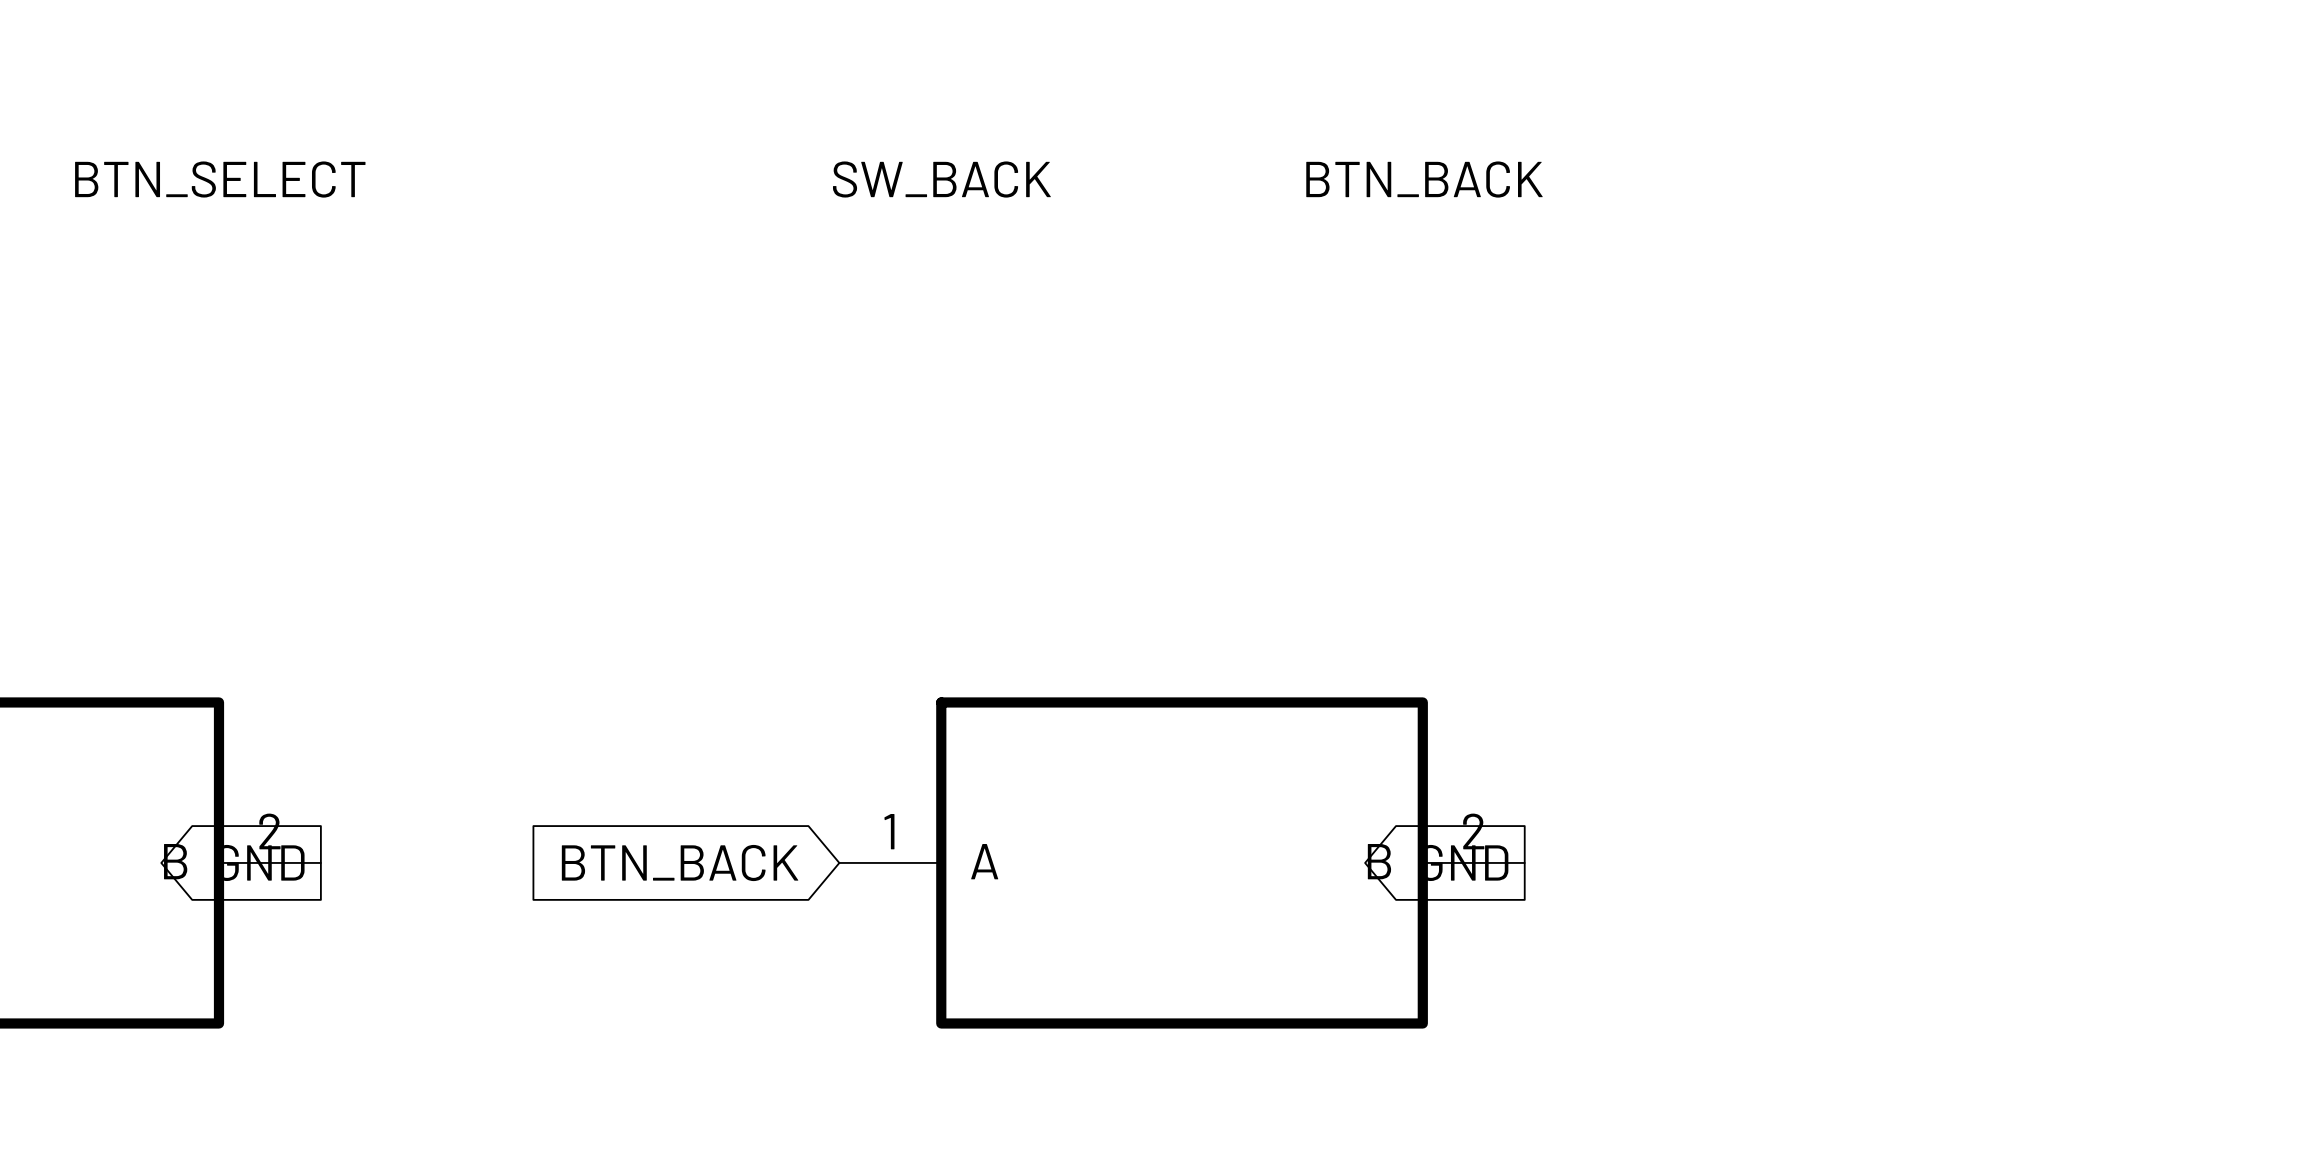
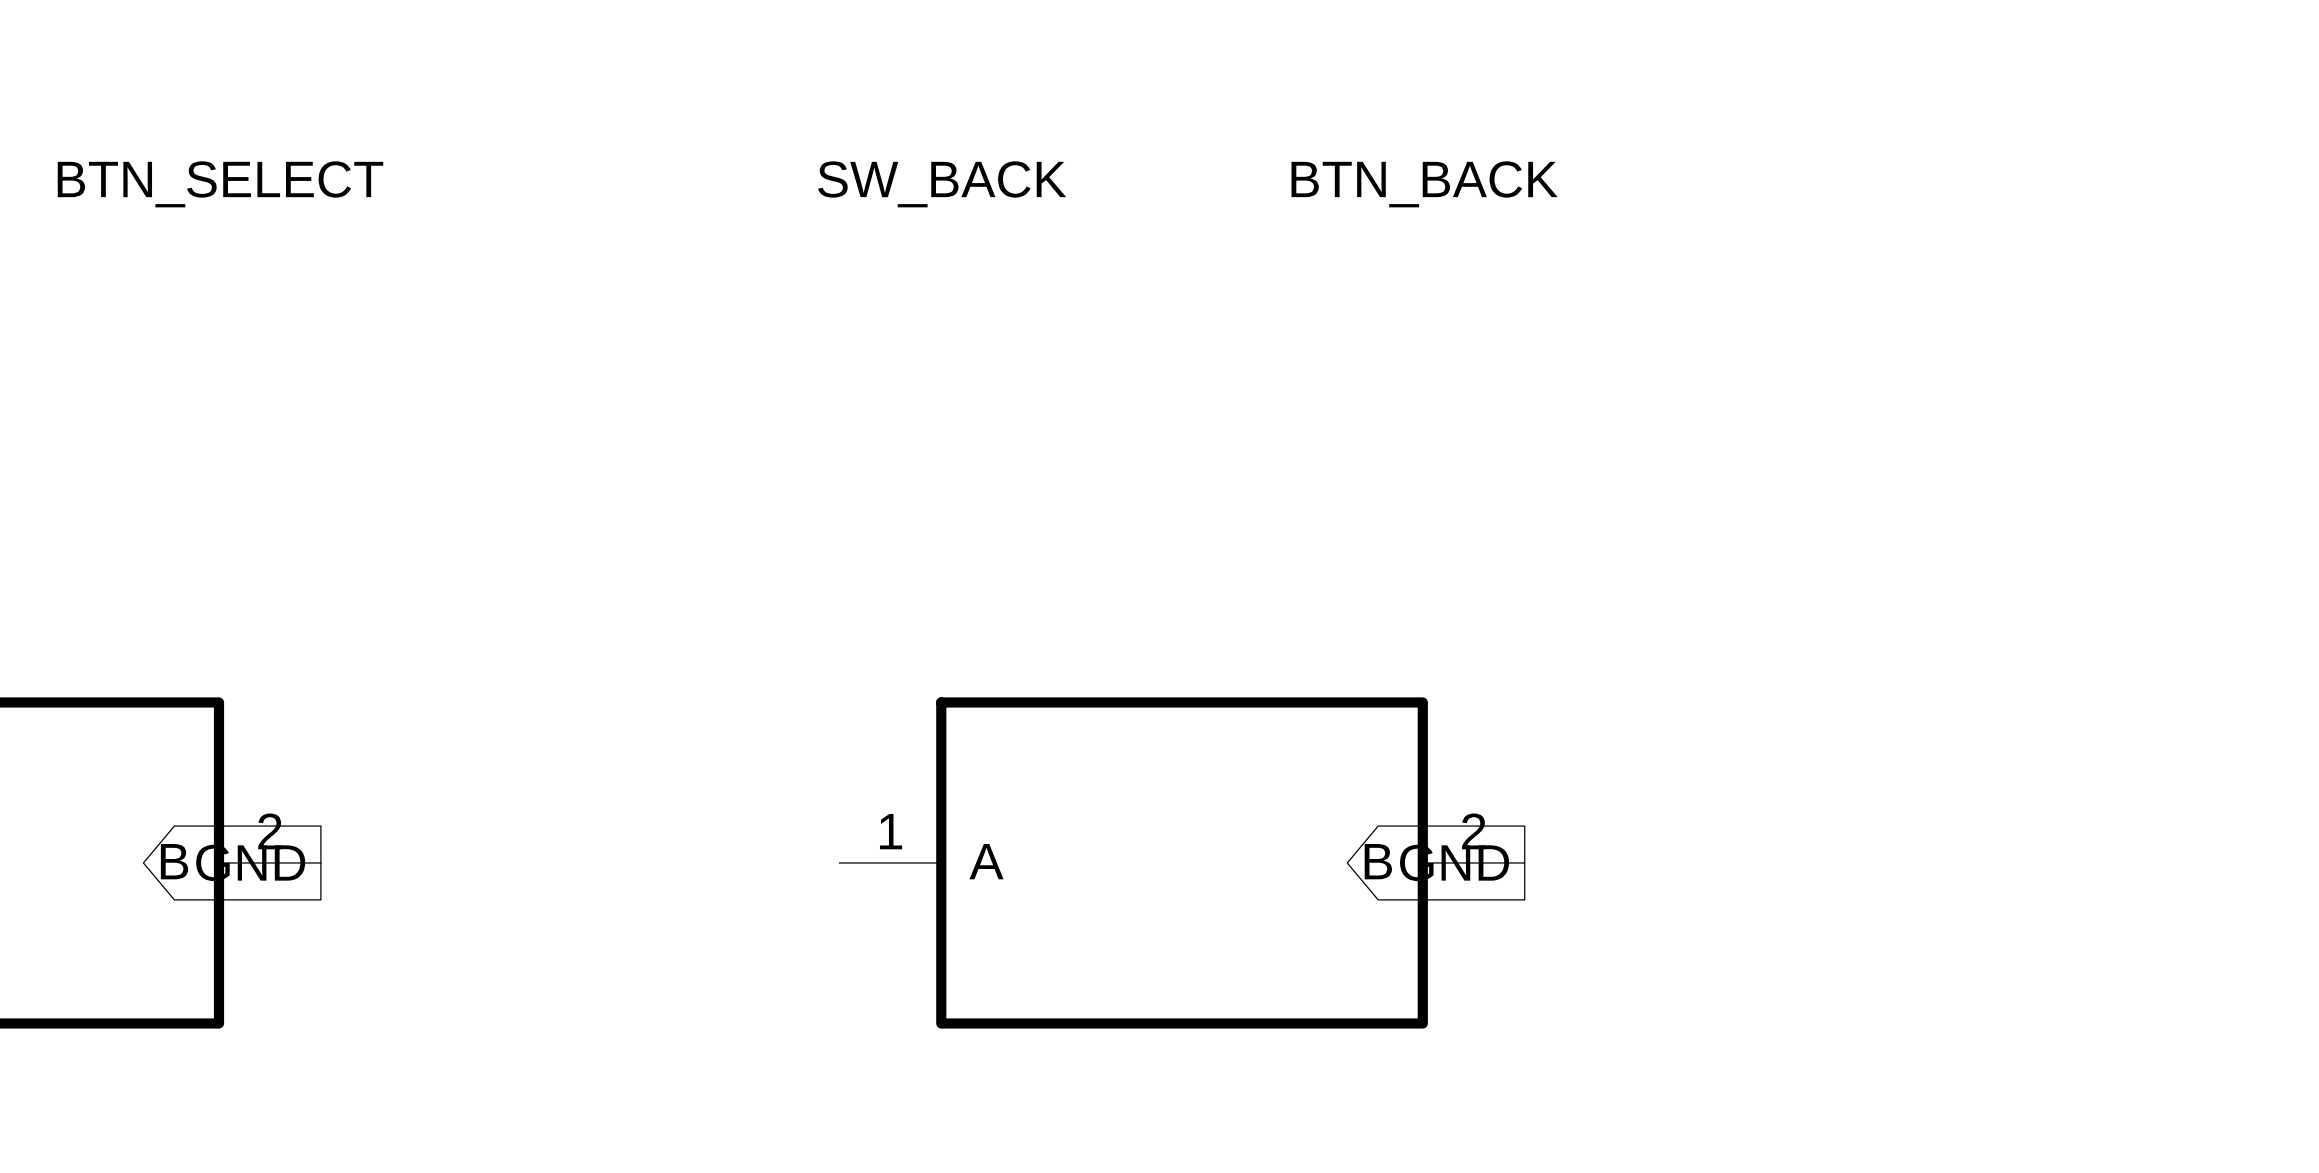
global label: BTN_BACK (680, 863) -> none

